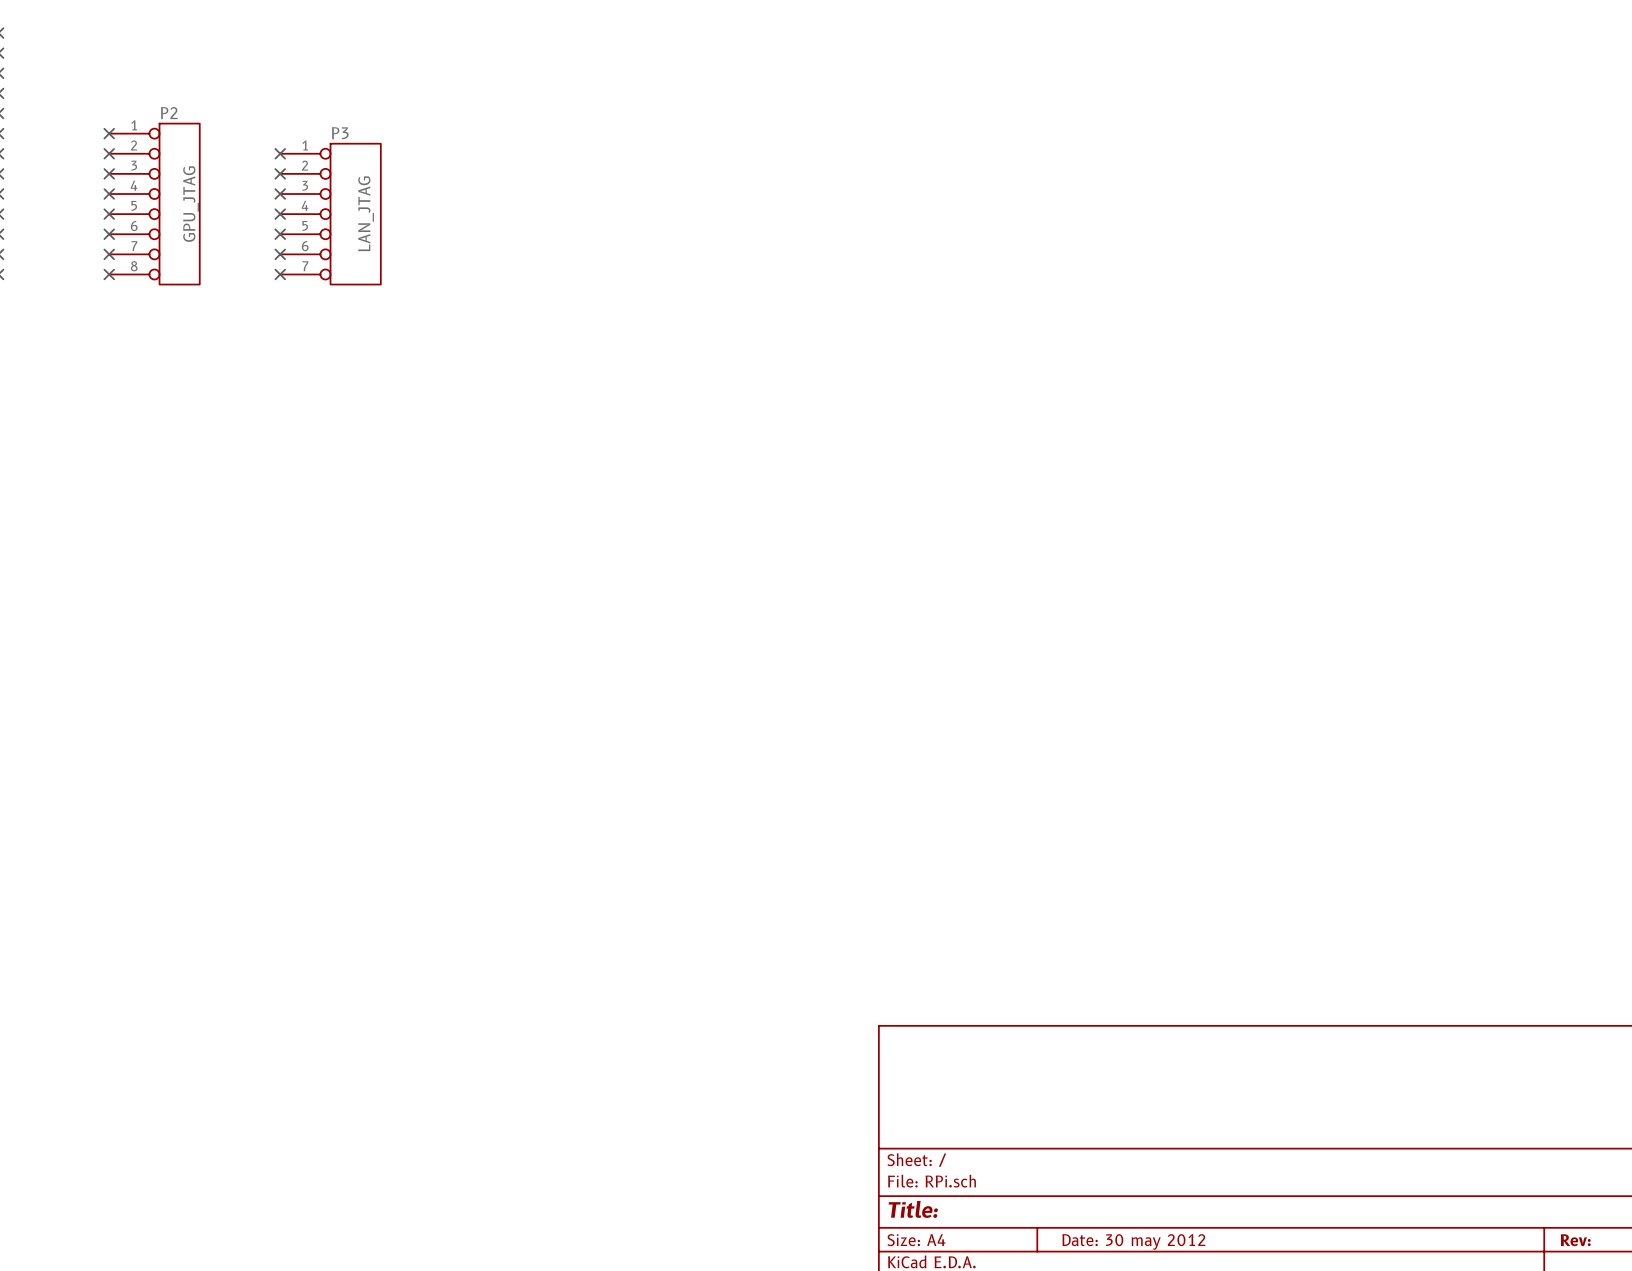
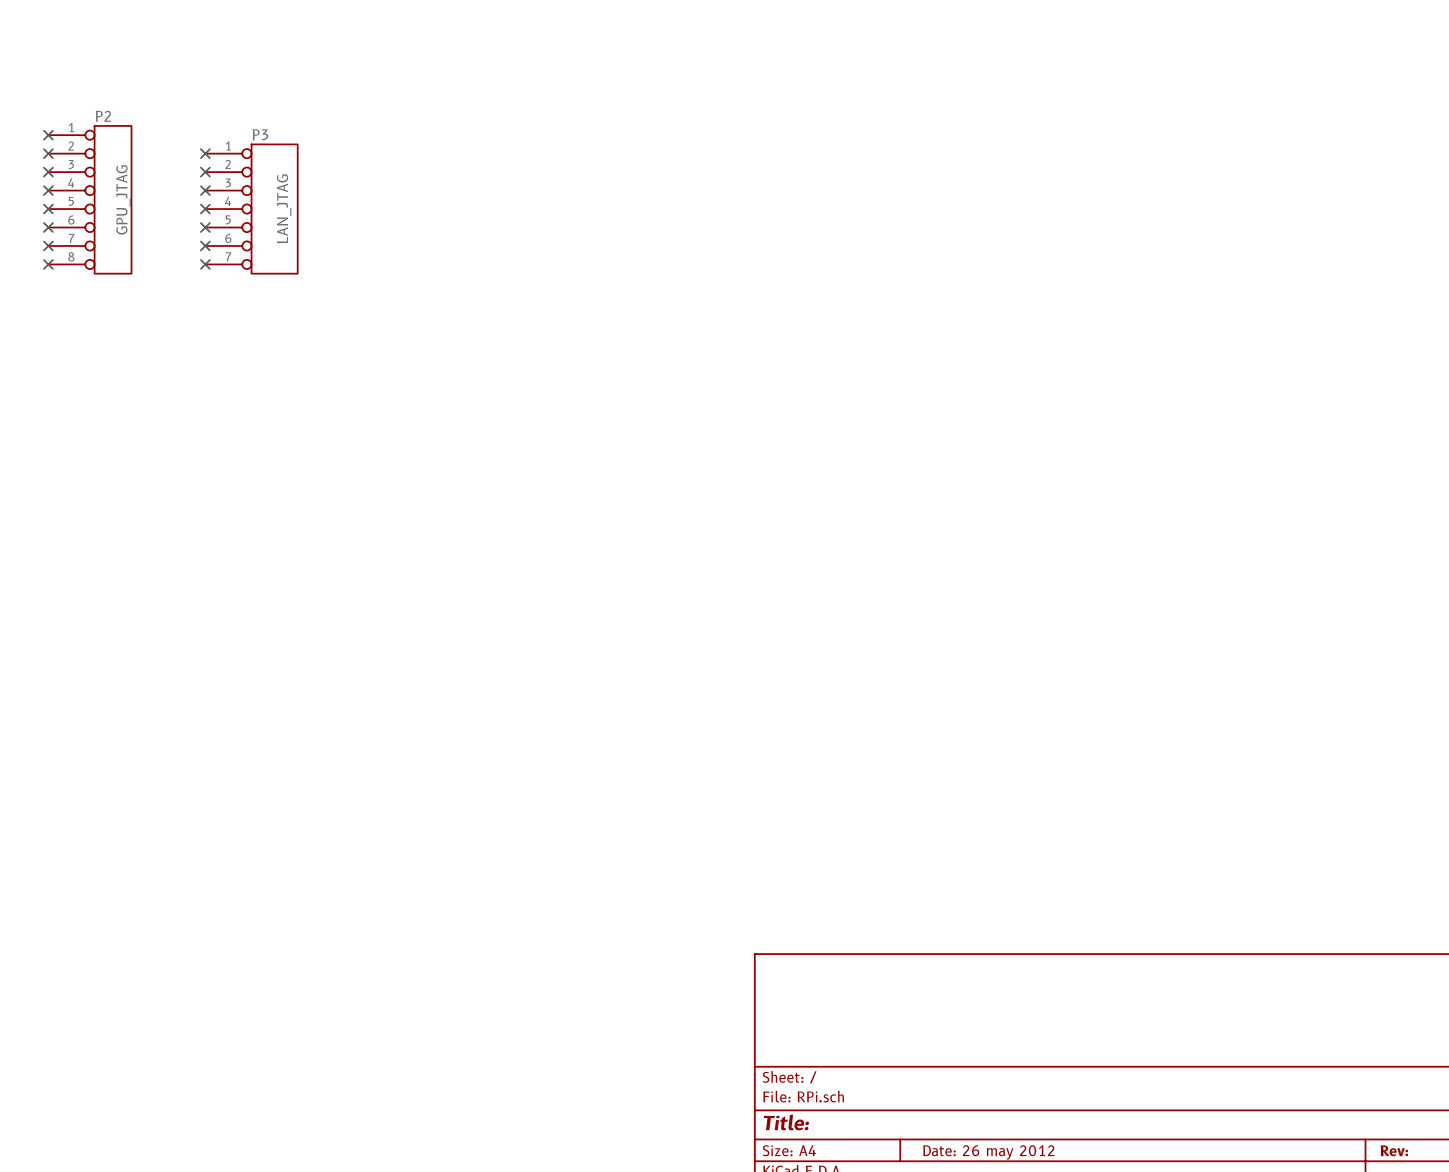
title block: Date: 30 may 2012 (1133, 1241) -> Date: 26 may 2012 (988, 1152)

